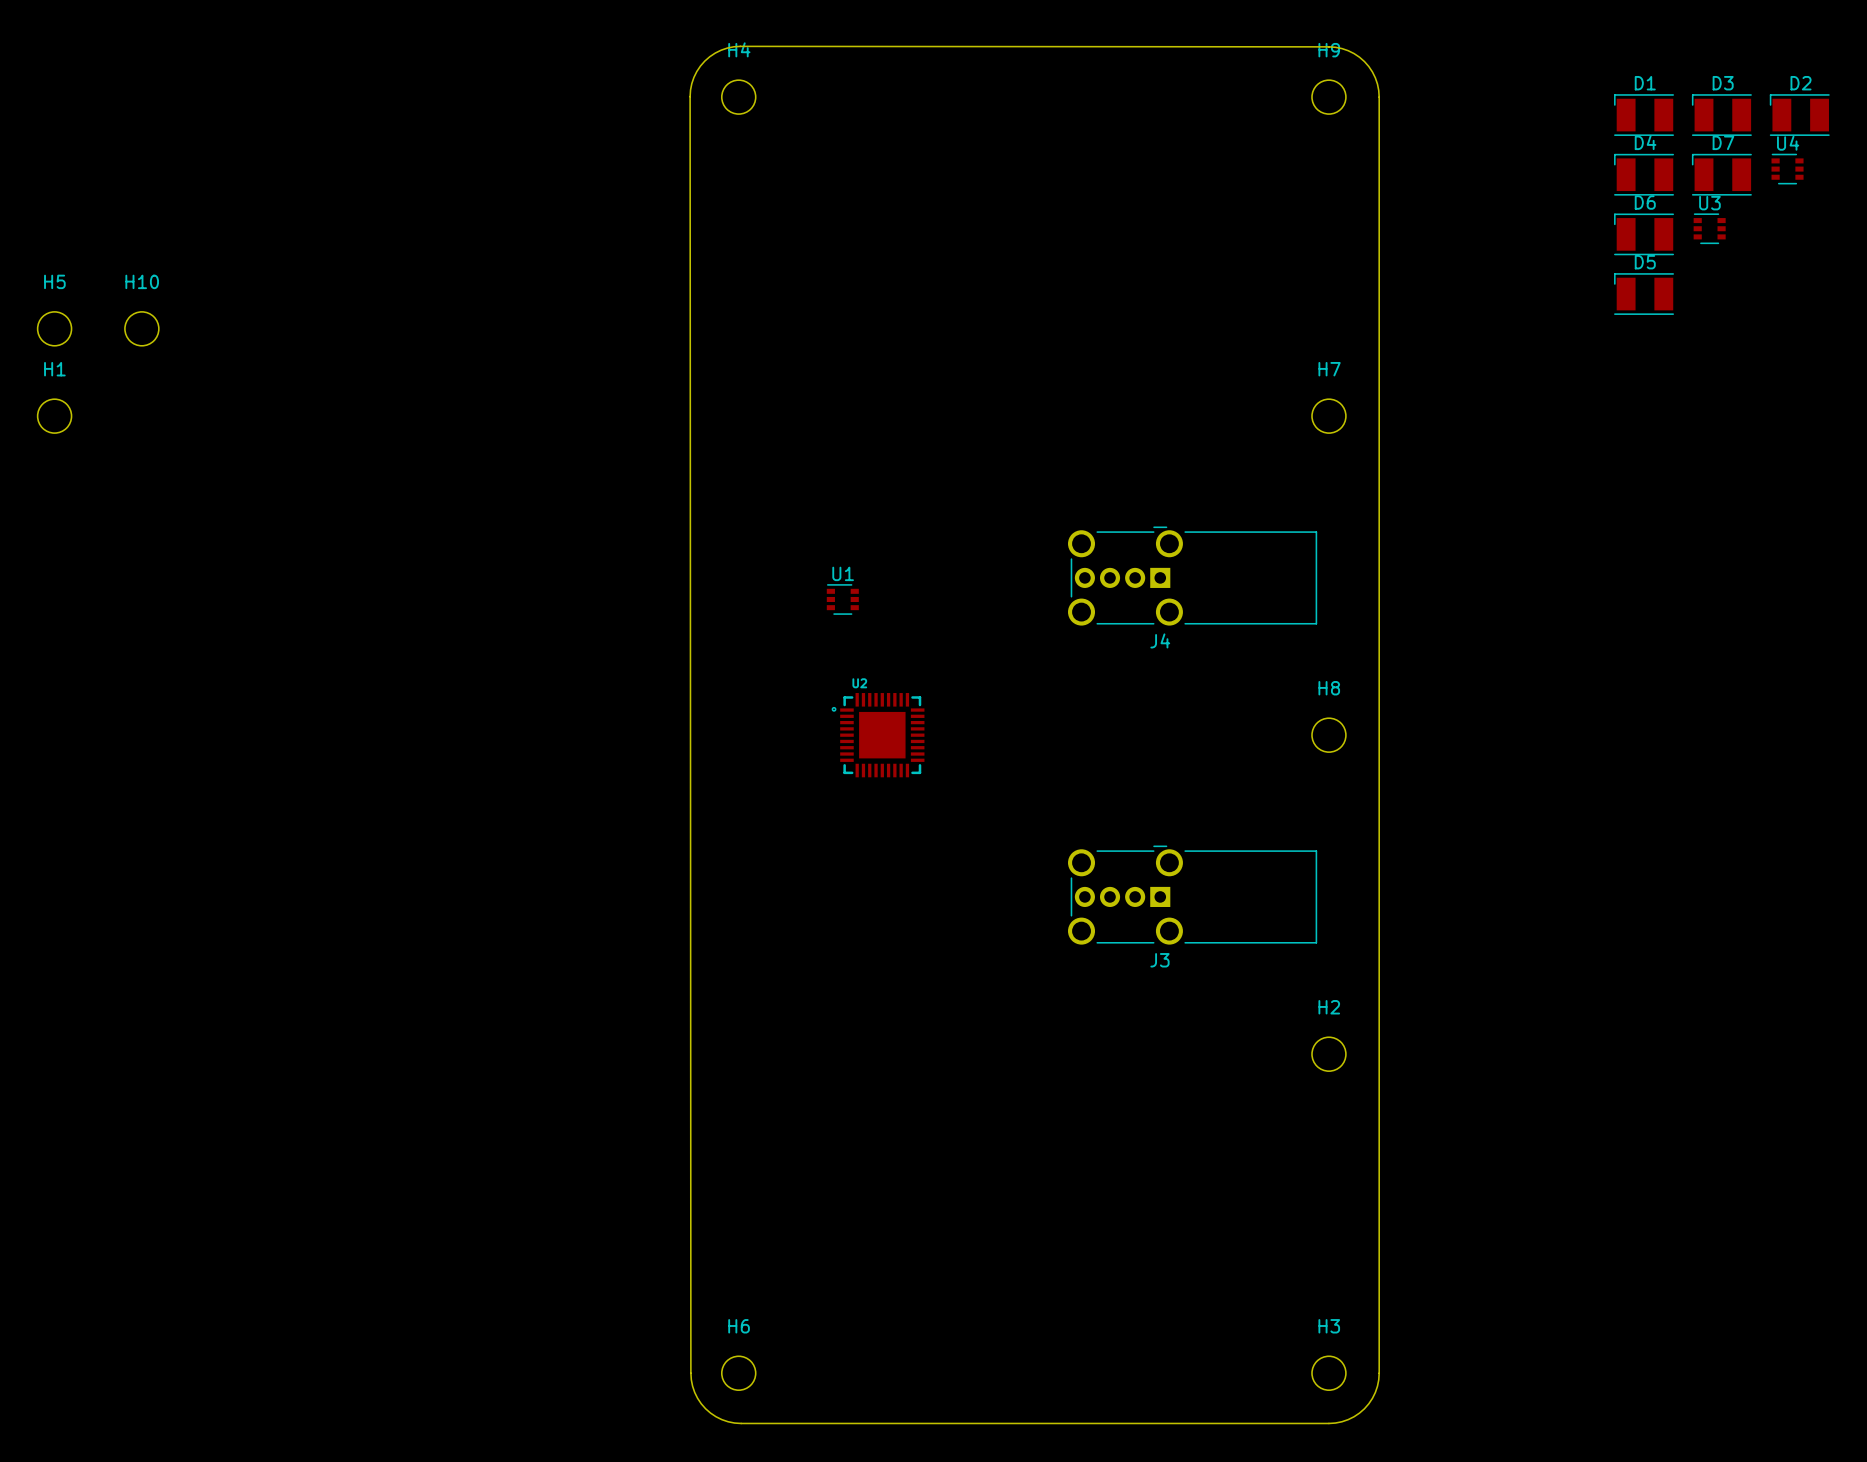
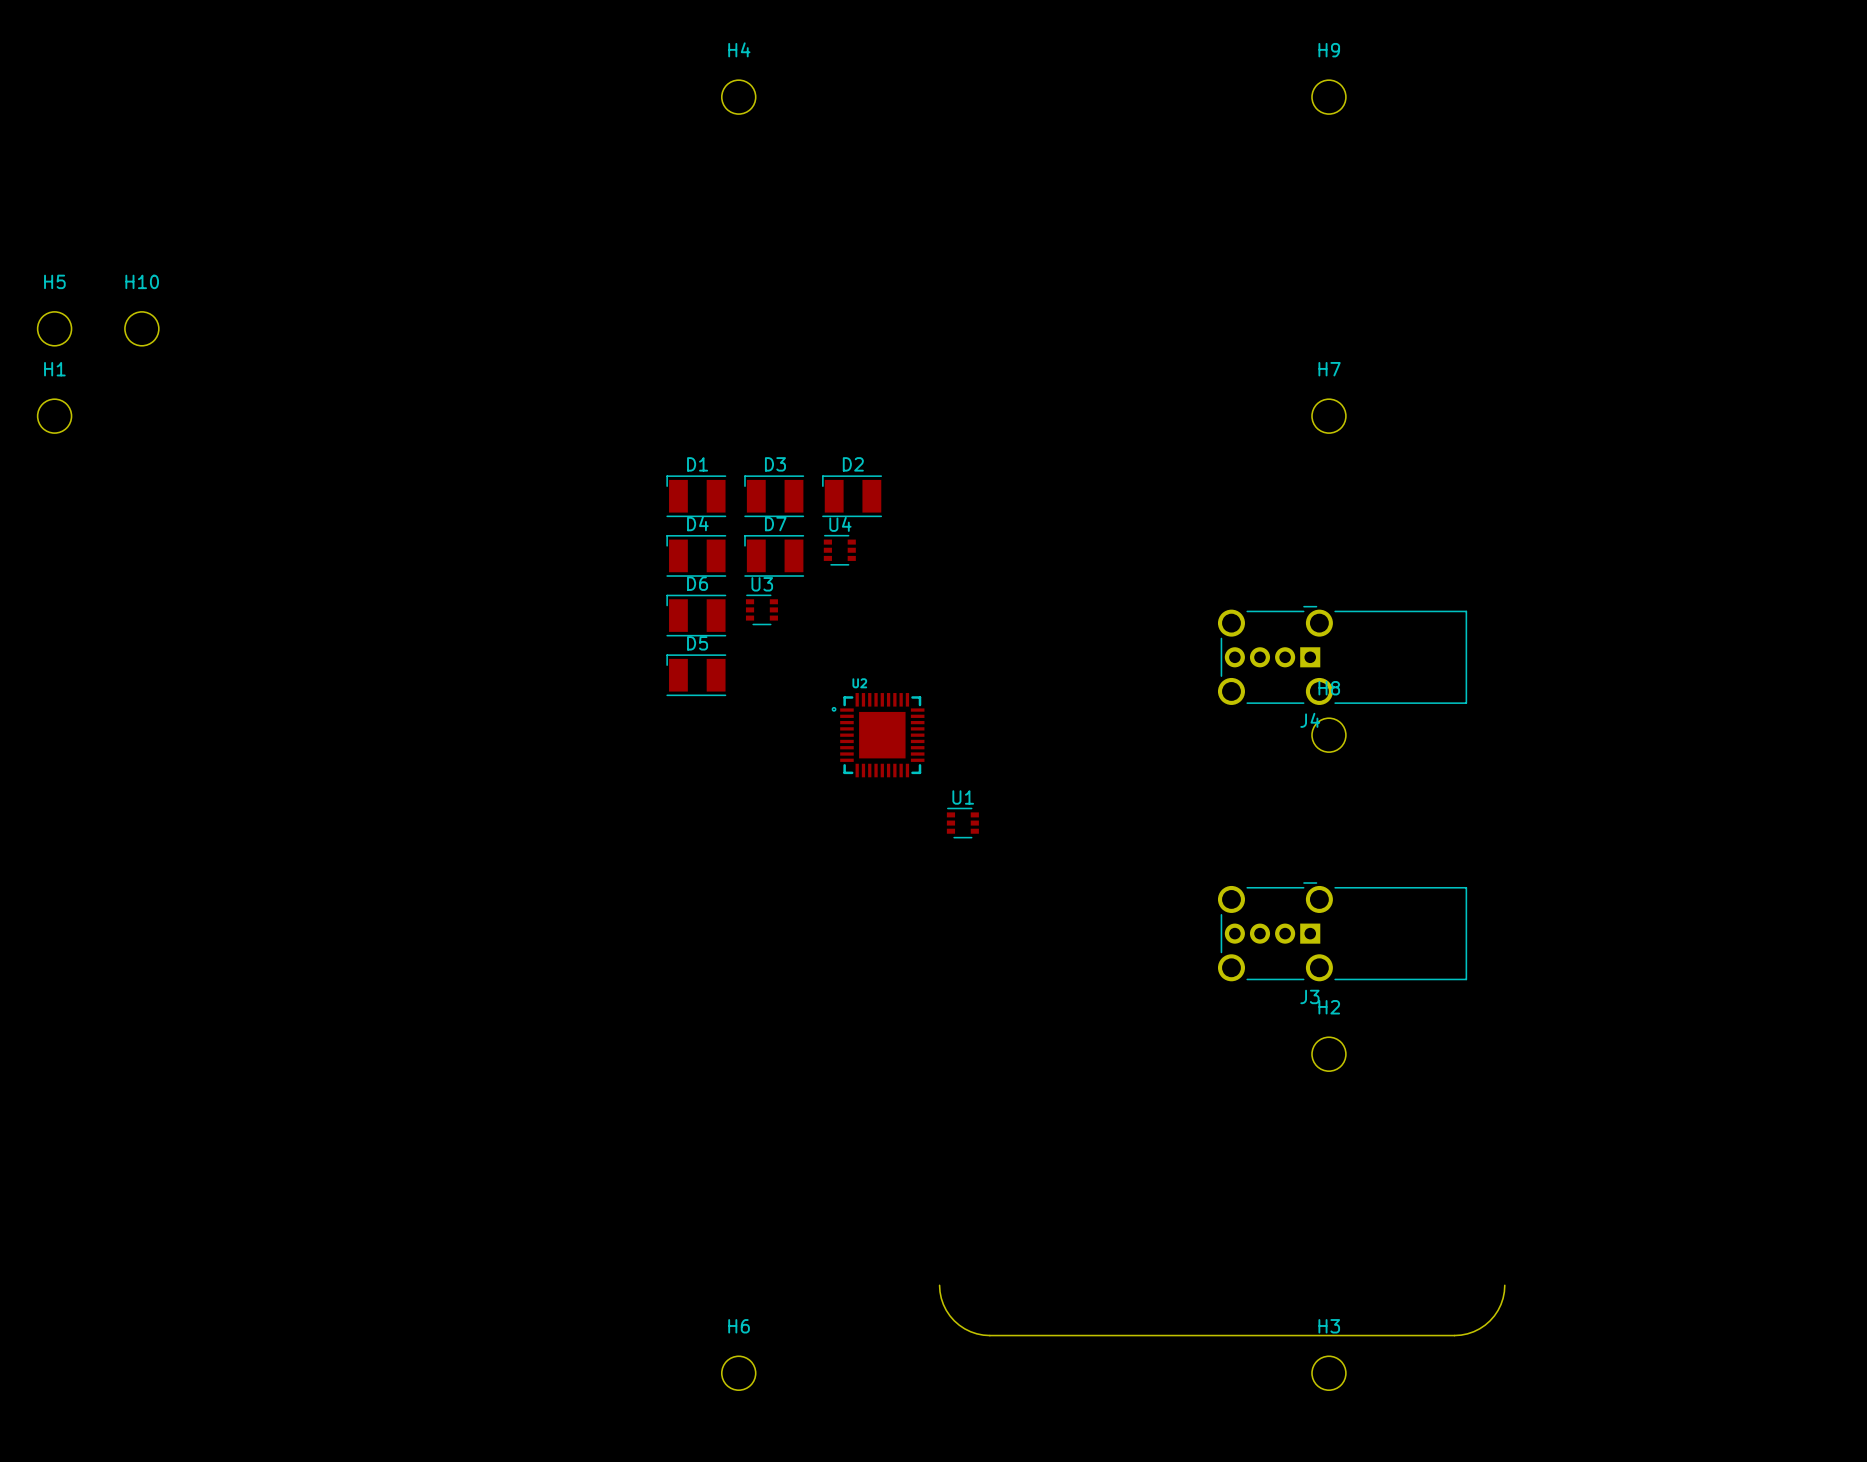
board edge: (740, 46) (1328, 46) (1341, 48) (1359, 57) (1368, 66) (1375, 77) (1379, 97) (1379, 1373) (1377, 1386) (1372, 1398) (1359, 1413) (1348, 1419) (1328, 1423) (741, 1423) (721, 1419) (710, 1413) (701, 1403) (694, 1392) (690, 1373) (690, 96) (693, 77) (704, 61) (721, 50) (740, 46) -> none
D1 position: (1644, 115) -> (696, 496)
D3 position: (1721, 115) -> (774, 496)
D2 position: (1799, 115) -> (852, 496)
U4 position: (1787, 169) -> (839, 550)
D4 position: (1644, 174) -> (696, 555)
D7 position: (1721, 174) -> (774, 555)
U3 position: (1709, 228) -> (761, 609)
D6 position: (1644, 234) -> (696, 615)
D5 position: (1644, 294) -> (696, 675)
J4 position: (1192, 576) -> (1342, 655)
U1 position: (842, 599) -> (962, 823)
J3 position: (1192, 895) -> (1342, 931)
board edge: none -> (939, 1285) (943, 1304) (954, 1320) (970, 1331) (989, 1335) (1461, 1335) (1479, 1328) (1490, 1320) (1500, 1304) (1504, 1285)

